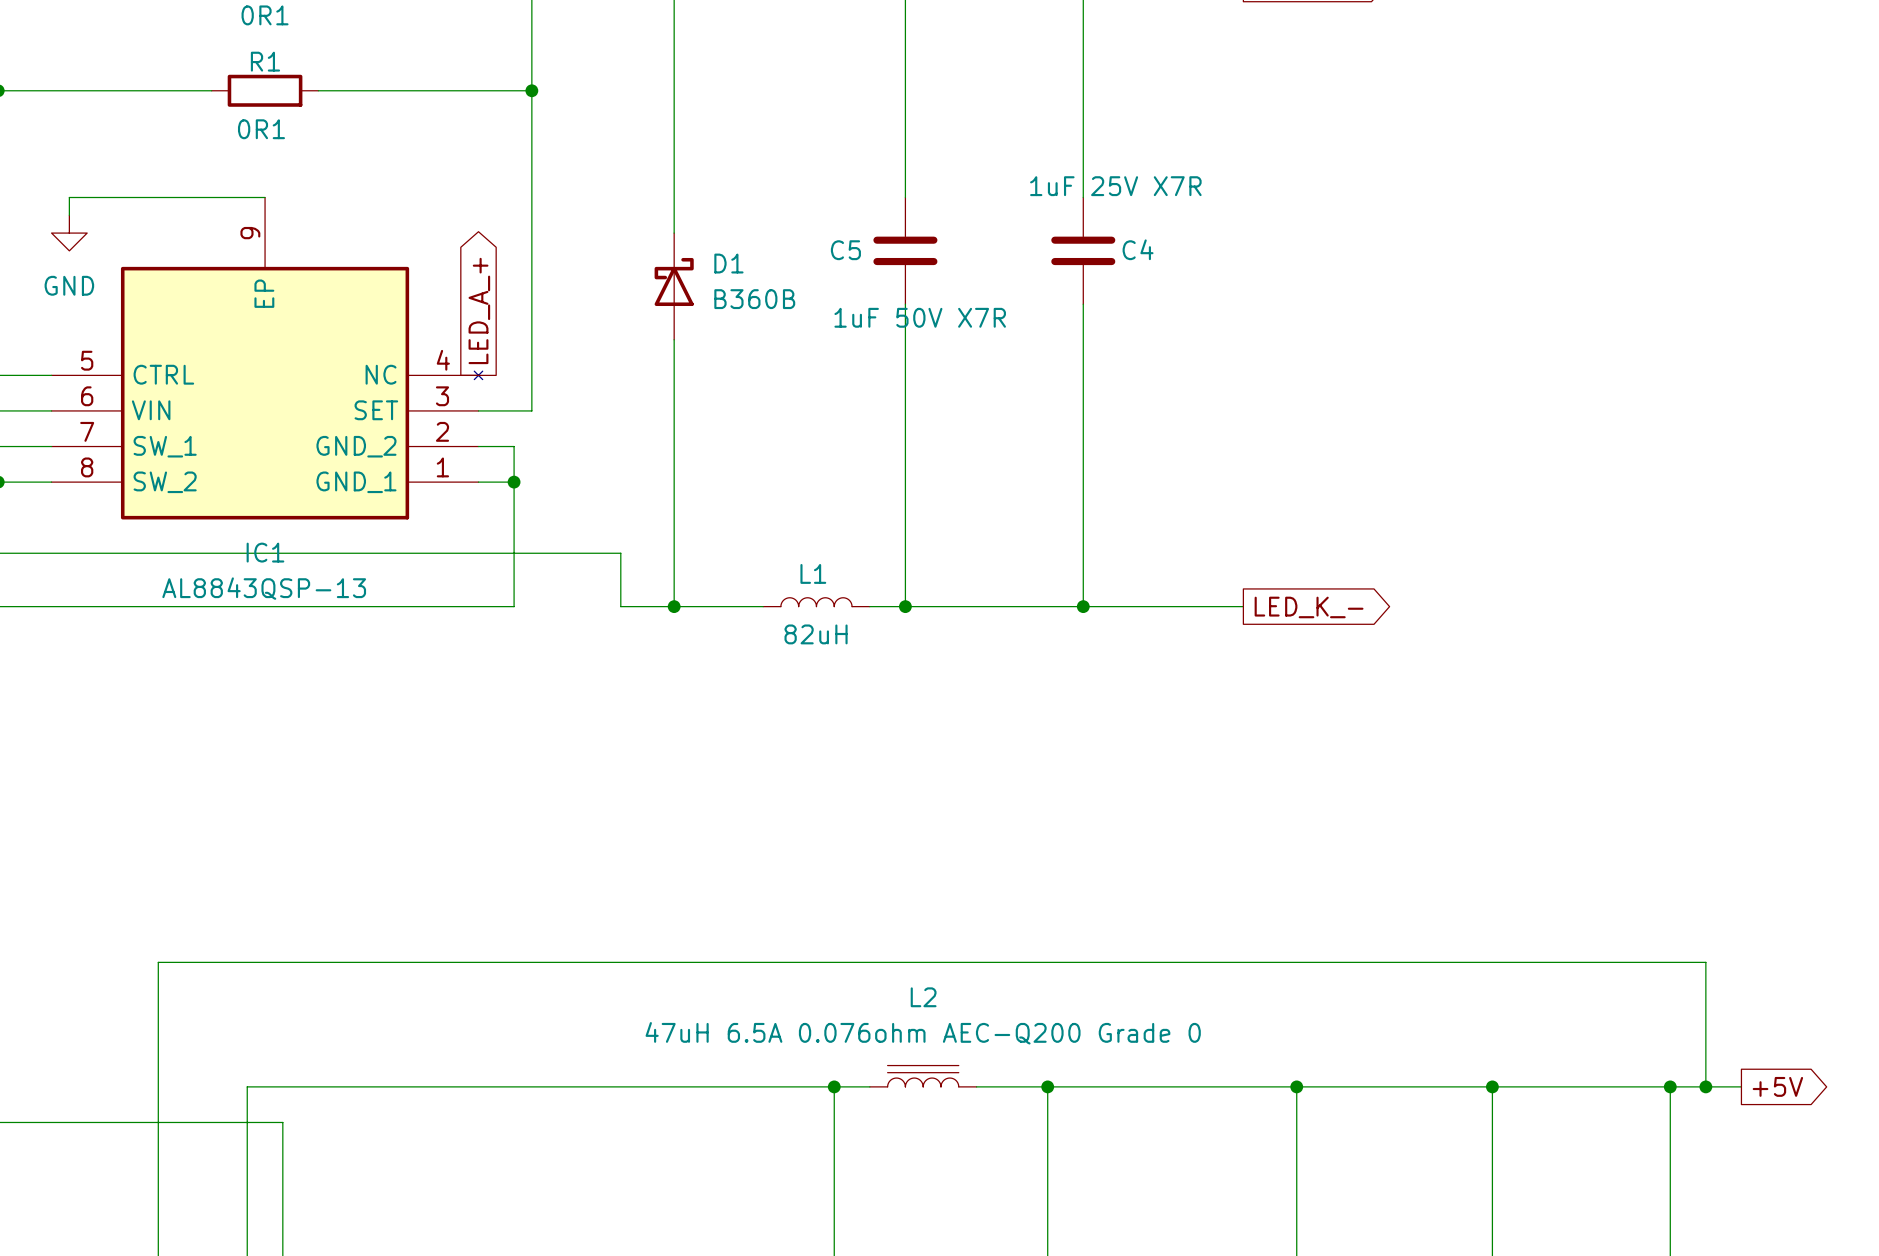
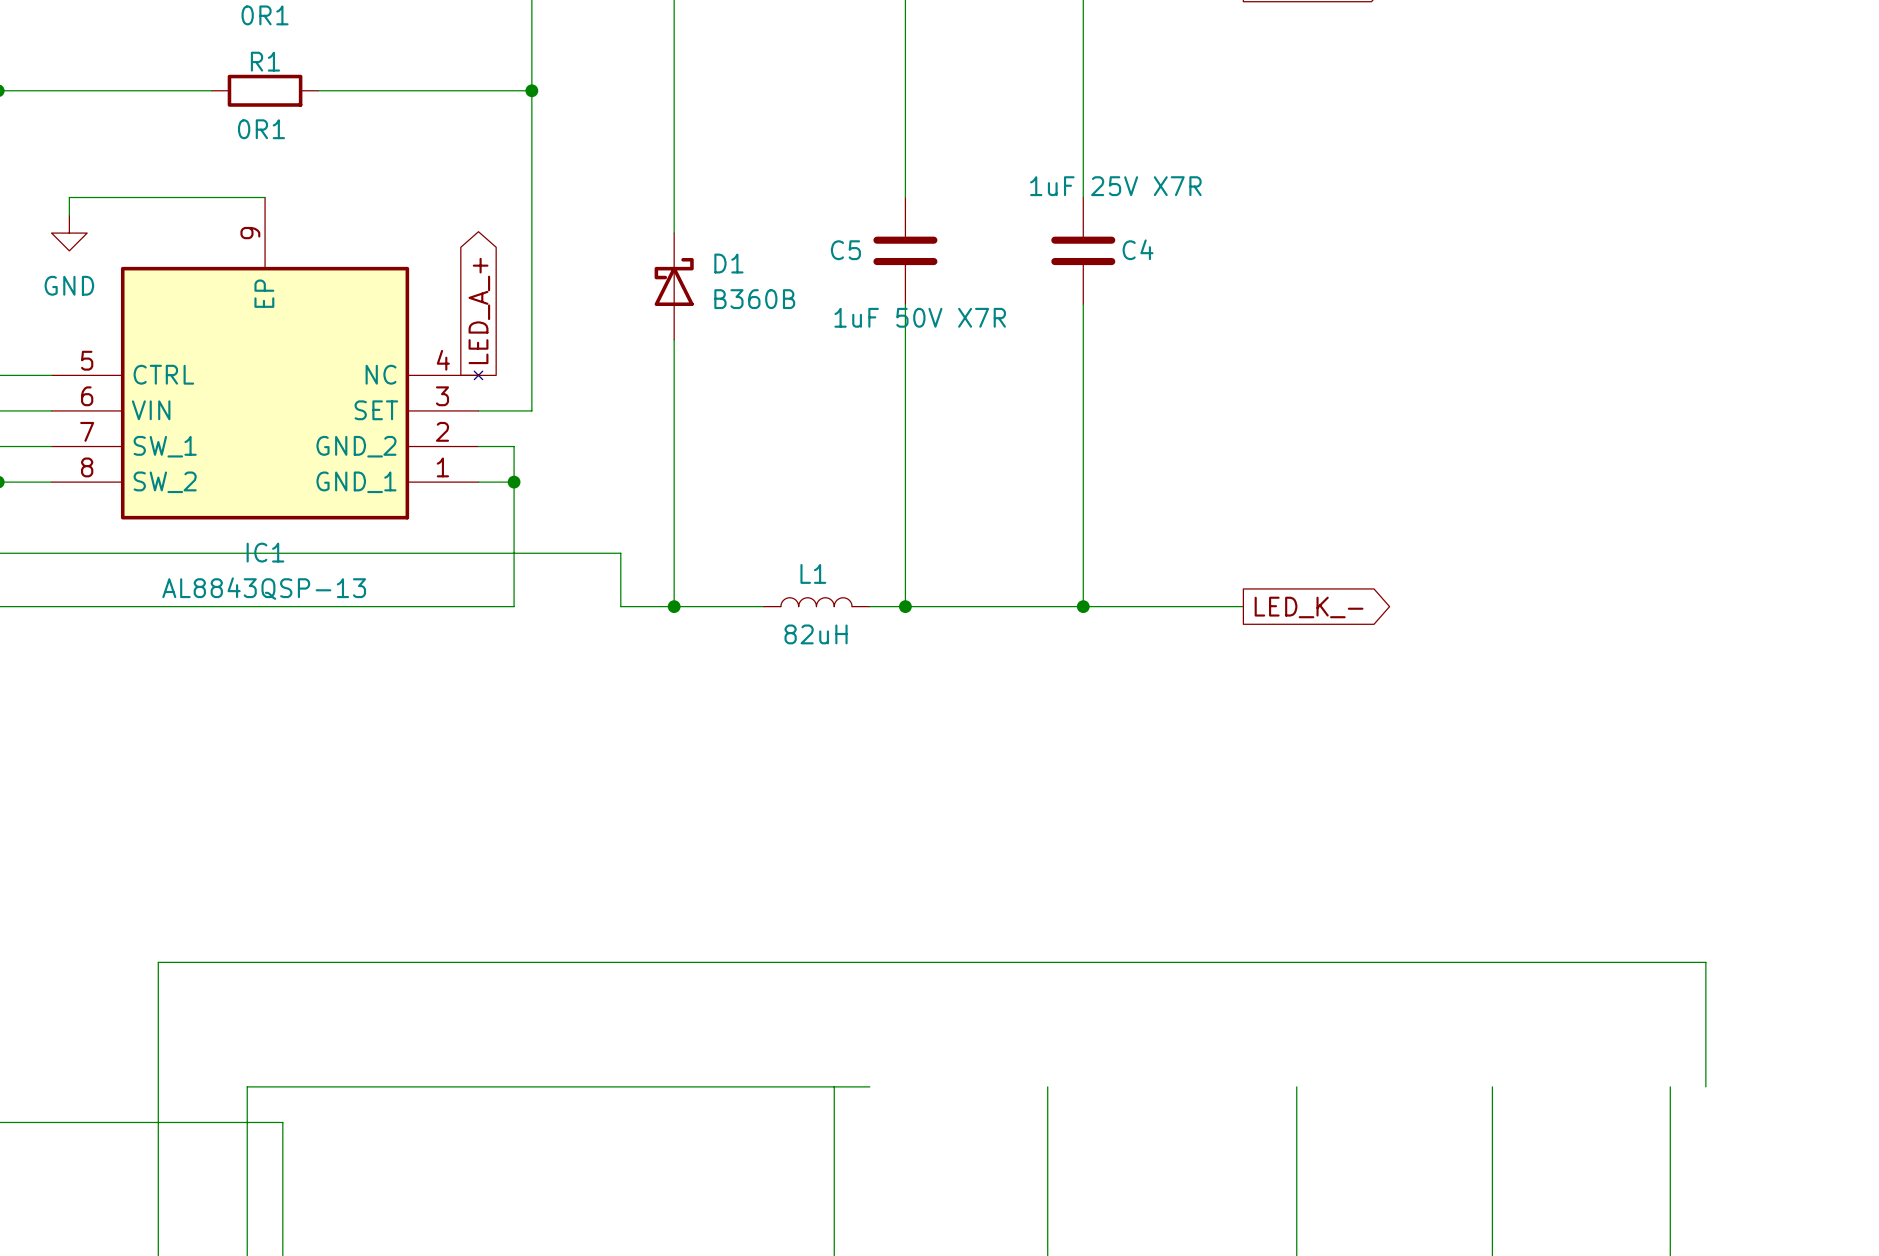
L2: 47uH 6.5A 0.076ohm AEC-Q200 Grade 0 (923, 1076) -> none
junction: (834, 1086) -> none
wire: (976, 1086) (1741, 1086) -> none
junction: (1047, 1086) -> none
junction: (1296, 1086) -> none
junction: (1492, 1086) -> none
junction: (1670, 1086) -> none
junction: (1705, 1086) -> none
global label: +5V (1777, 1086) -> none

